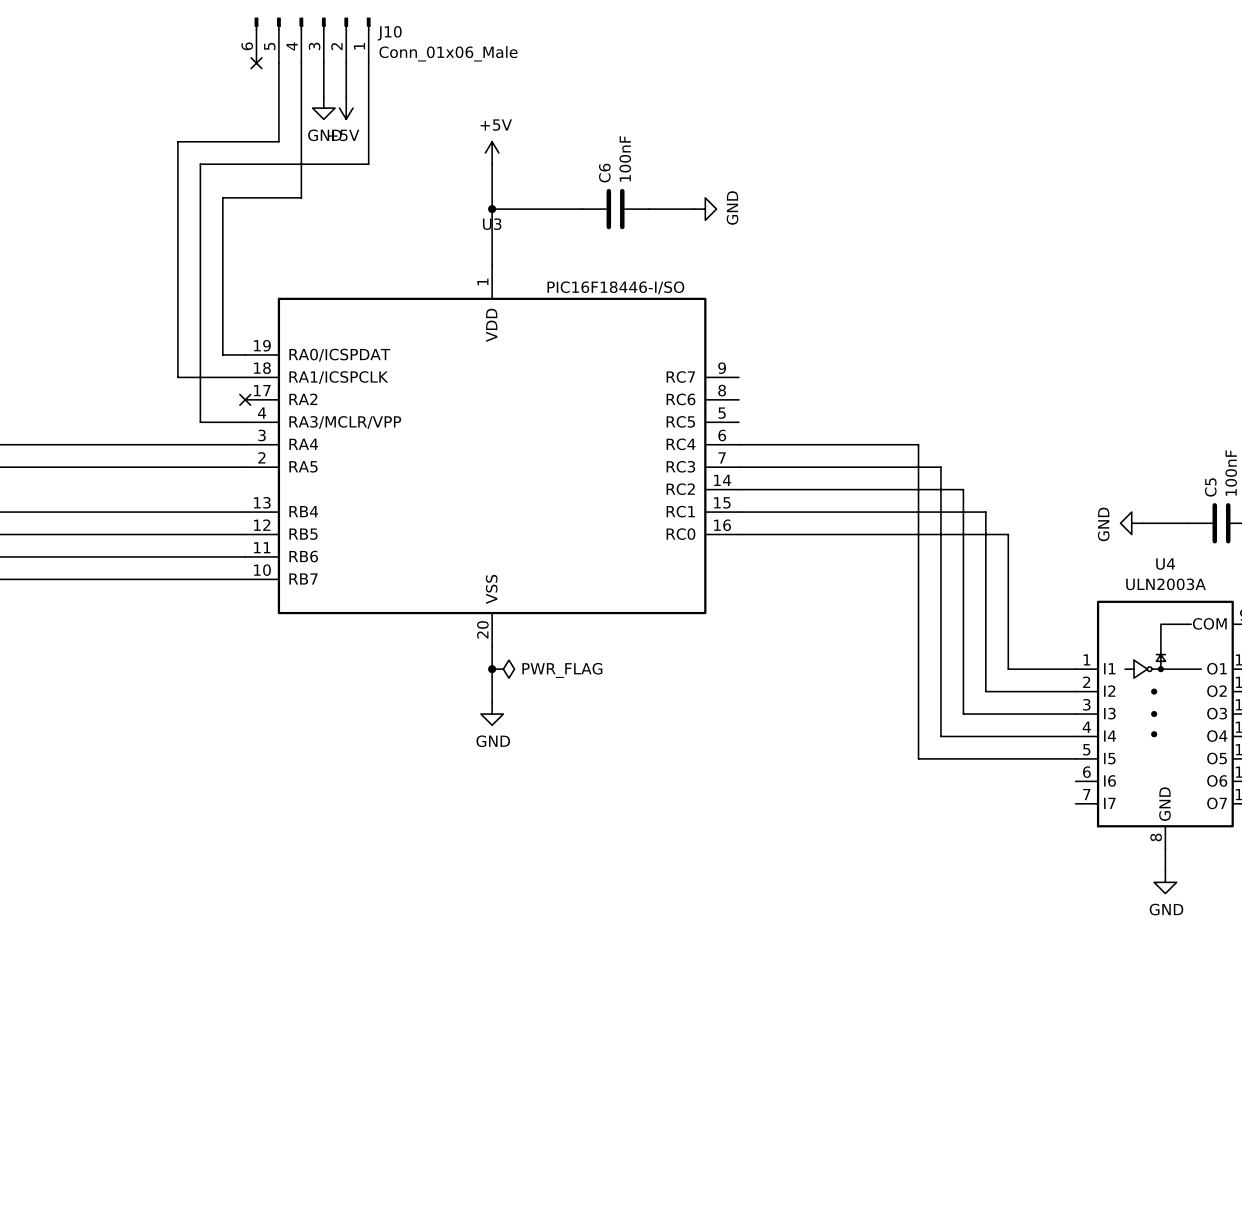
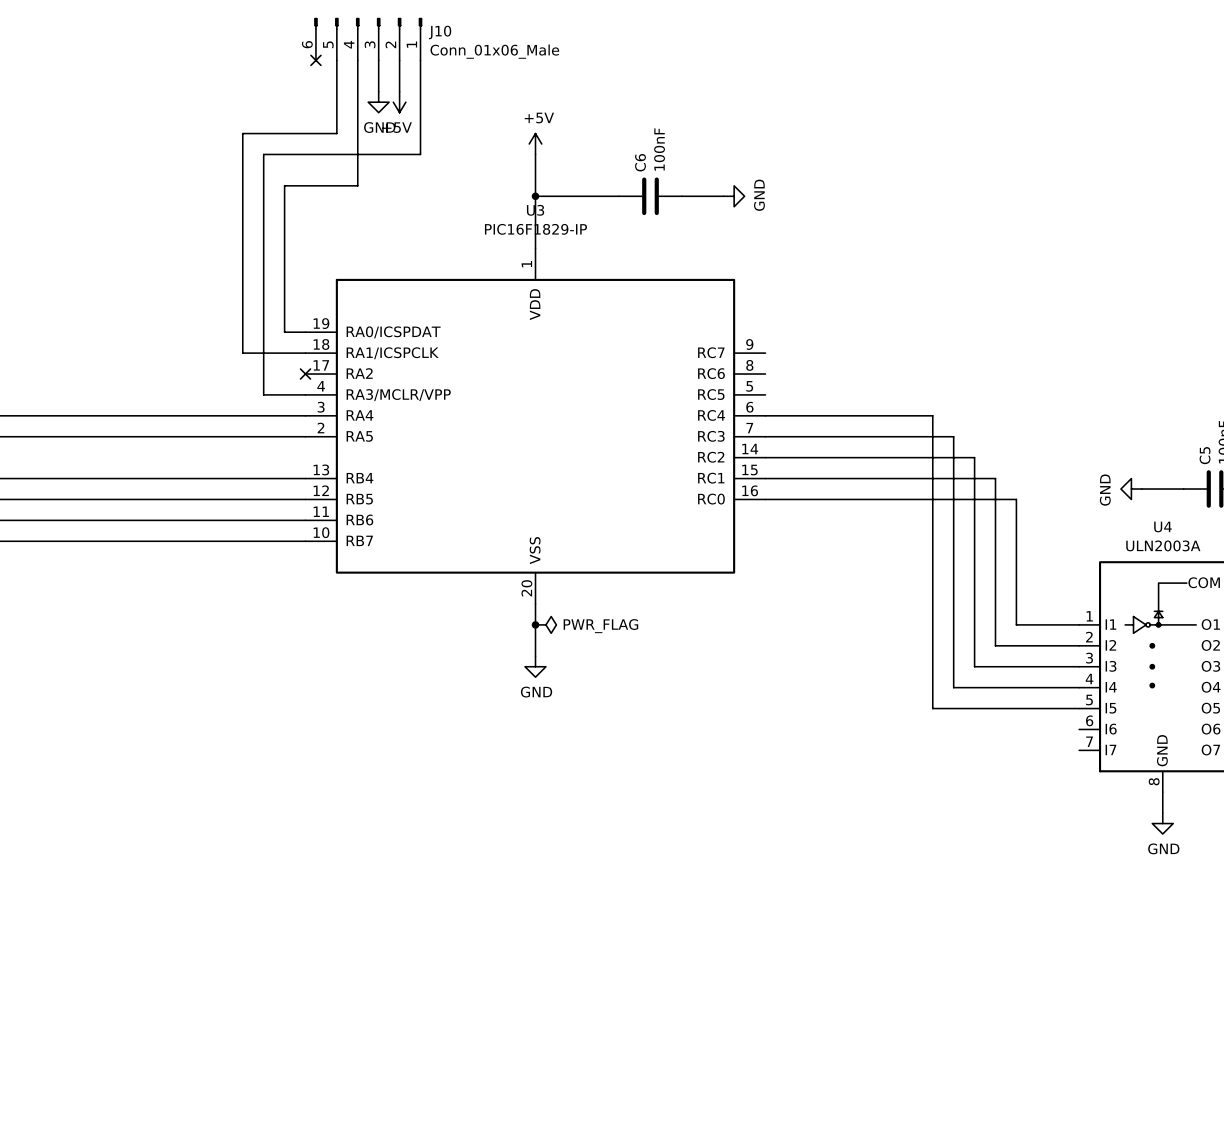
U3 value: PIC16F18446-I/SO (615, 287) -> PIC16F1829-IP (535, 229)

